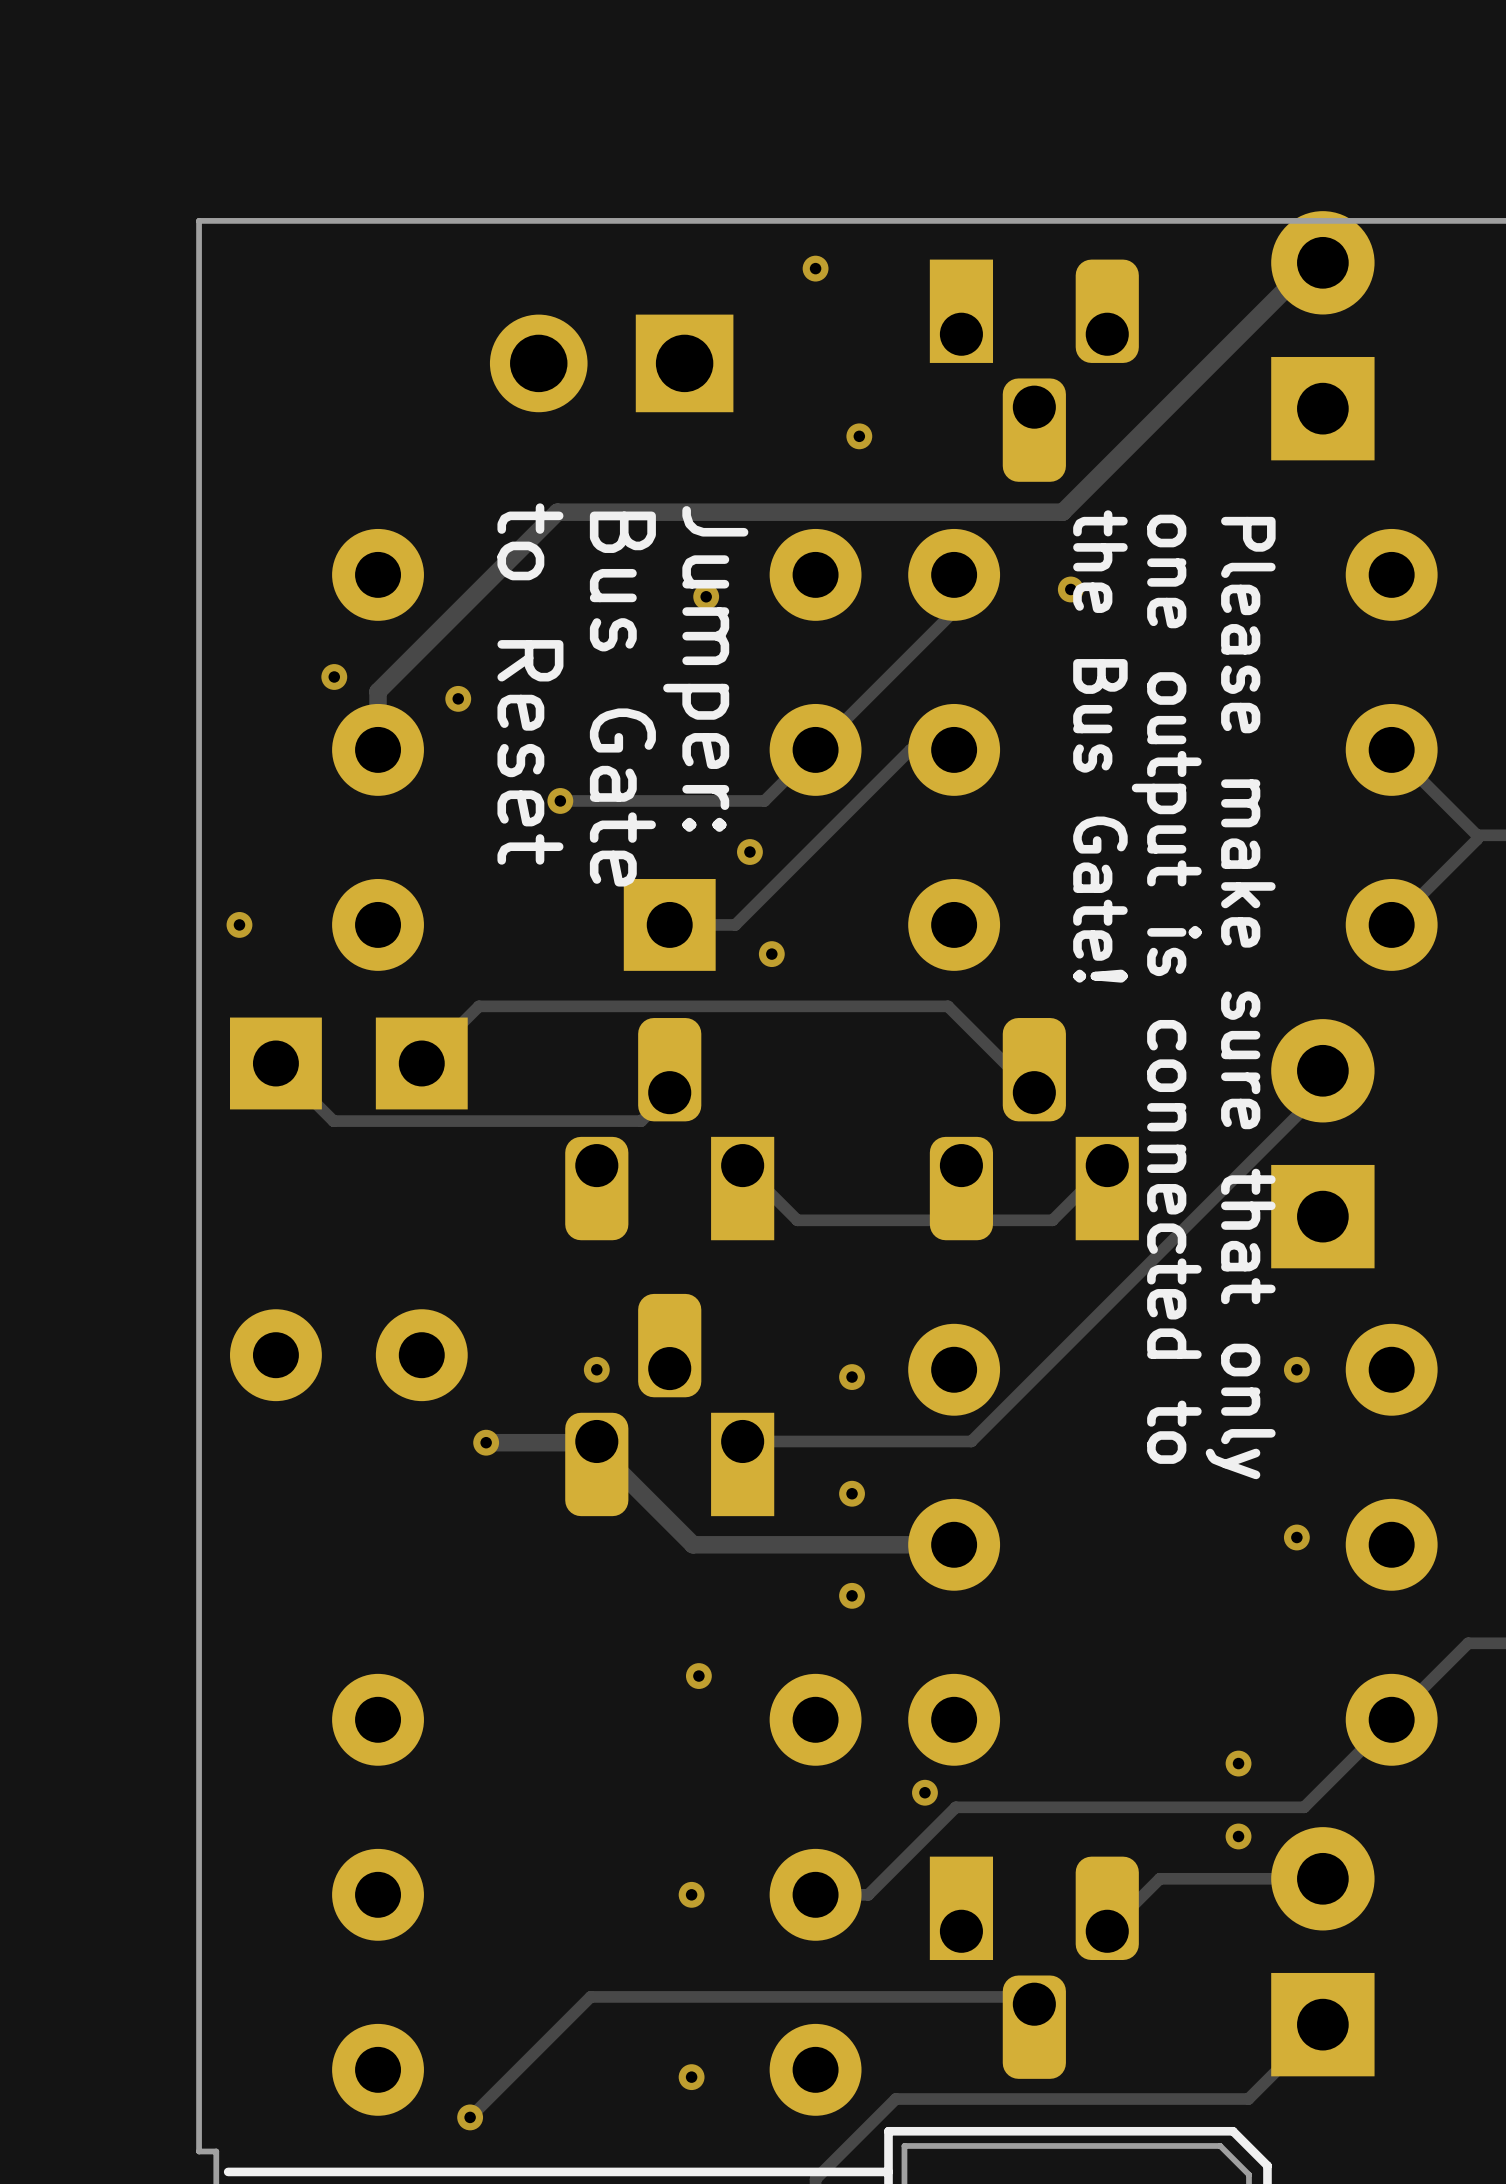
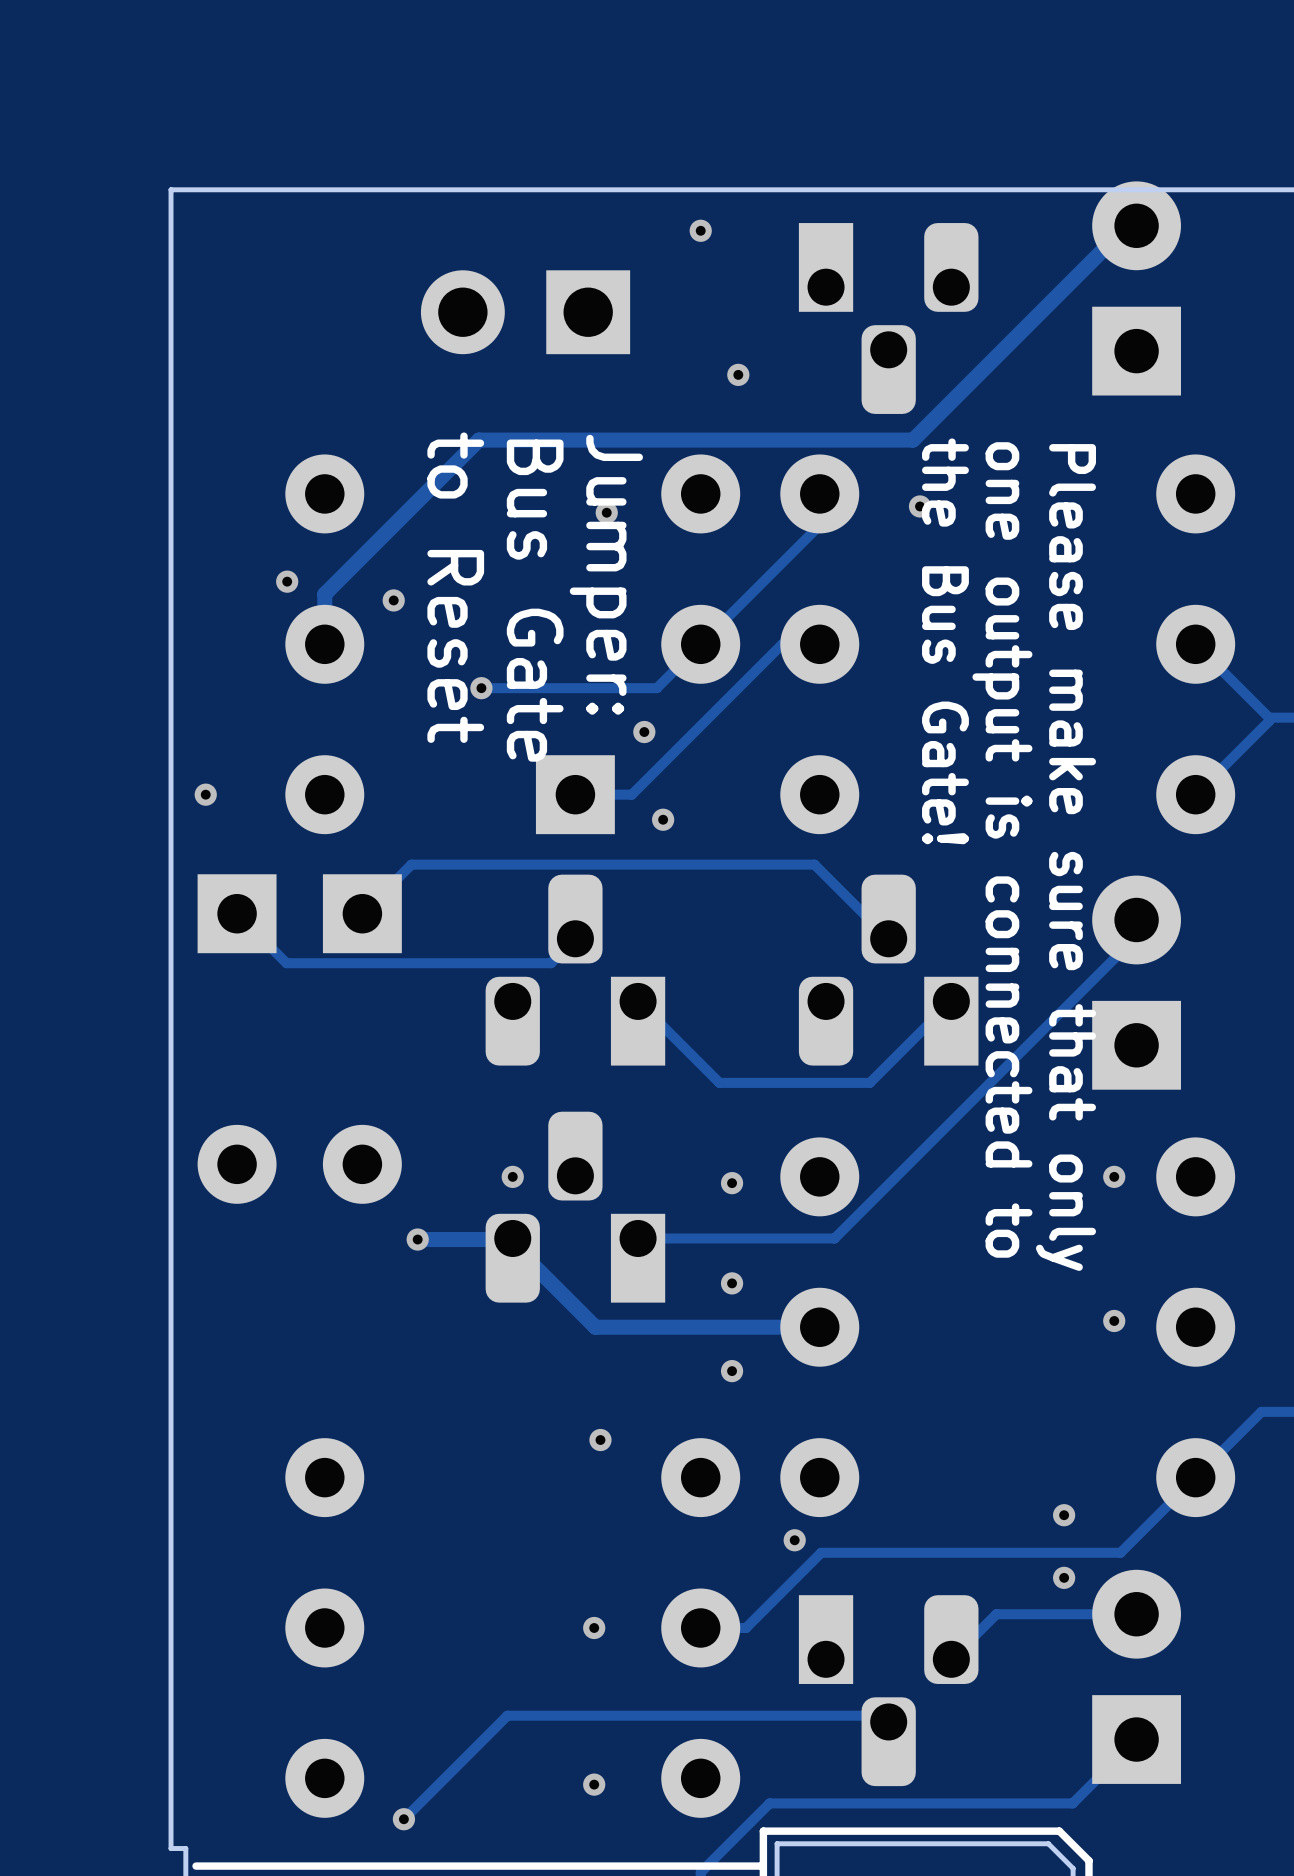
track: (1052, 1220) (797, 1220) -> (904, 1048) (869, 1082) (719, 1082) (685, 1048)

